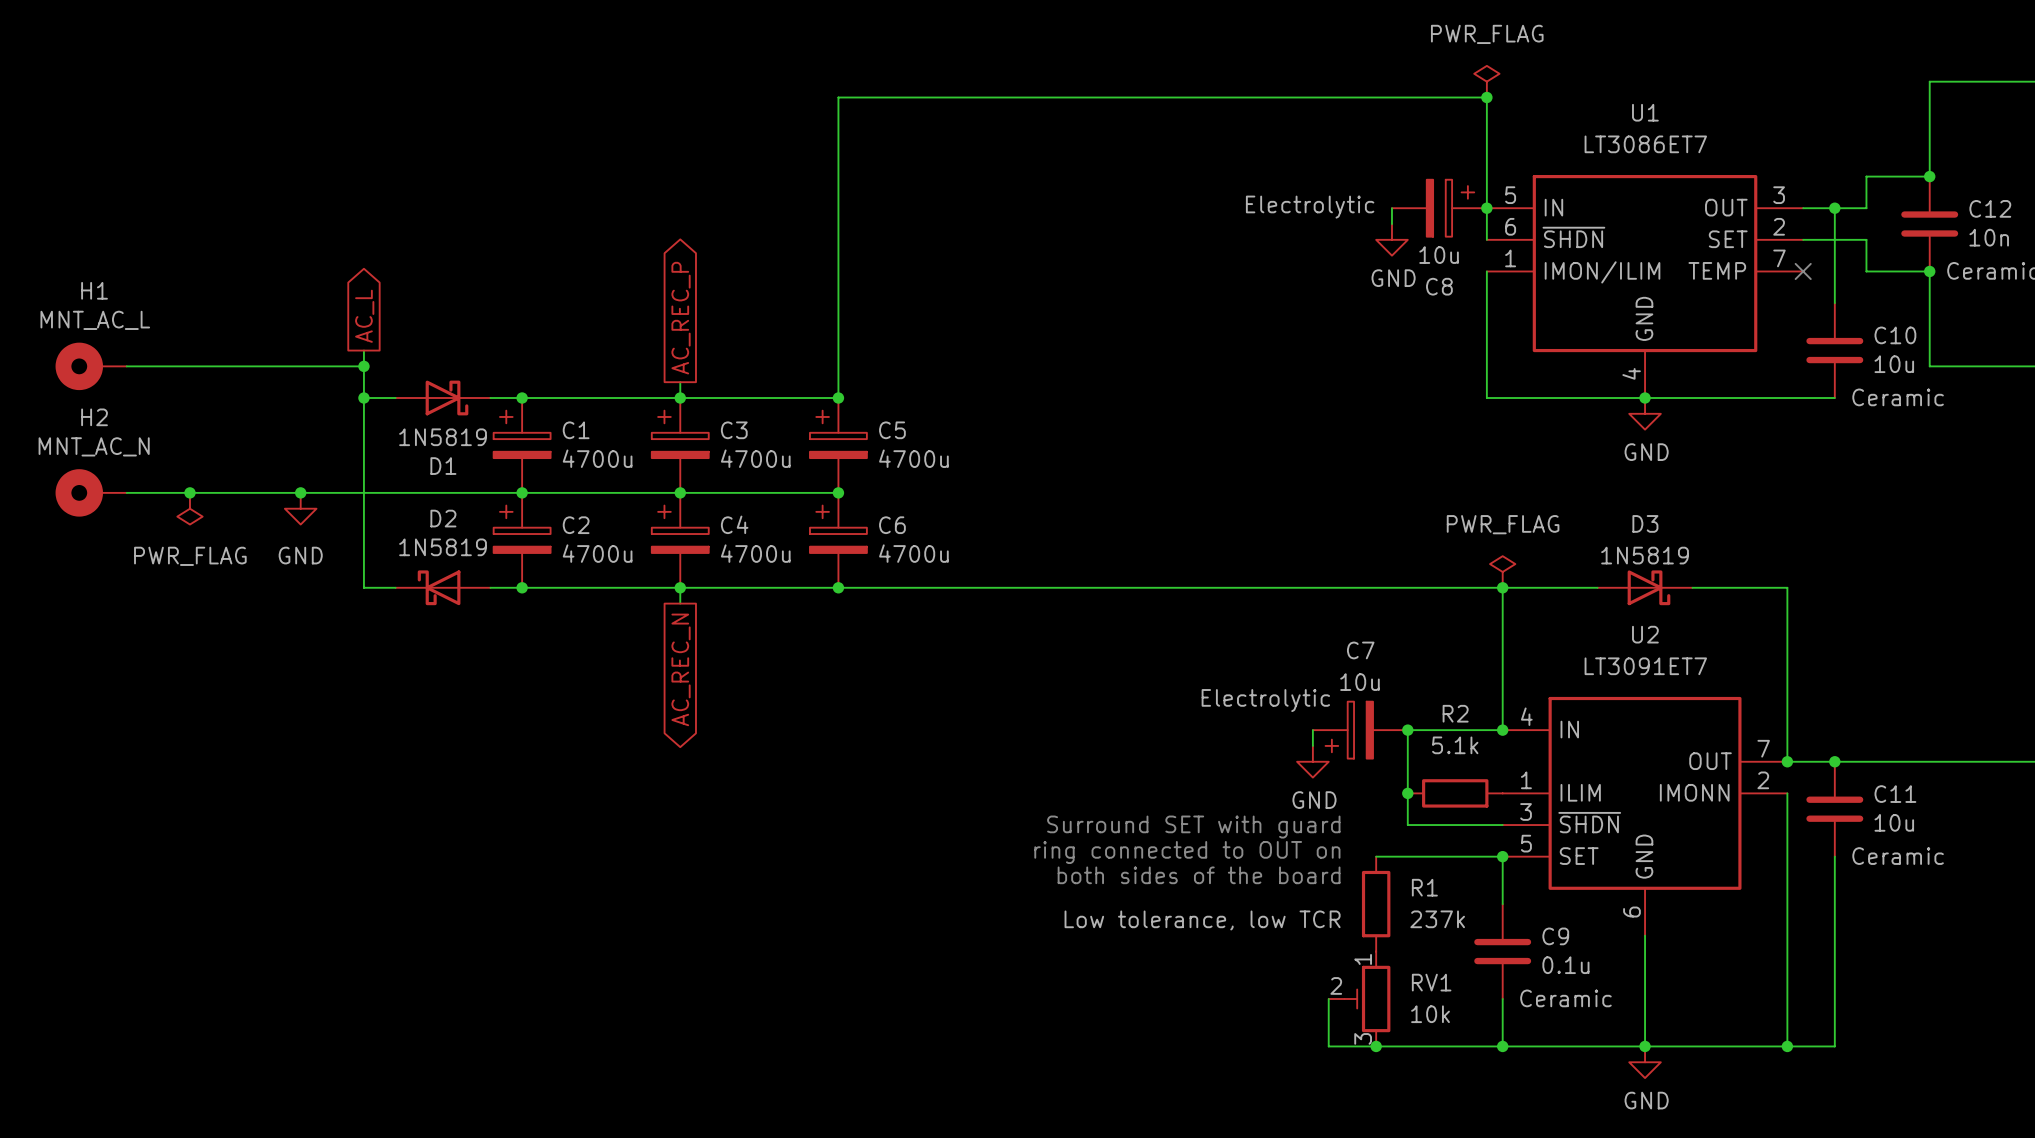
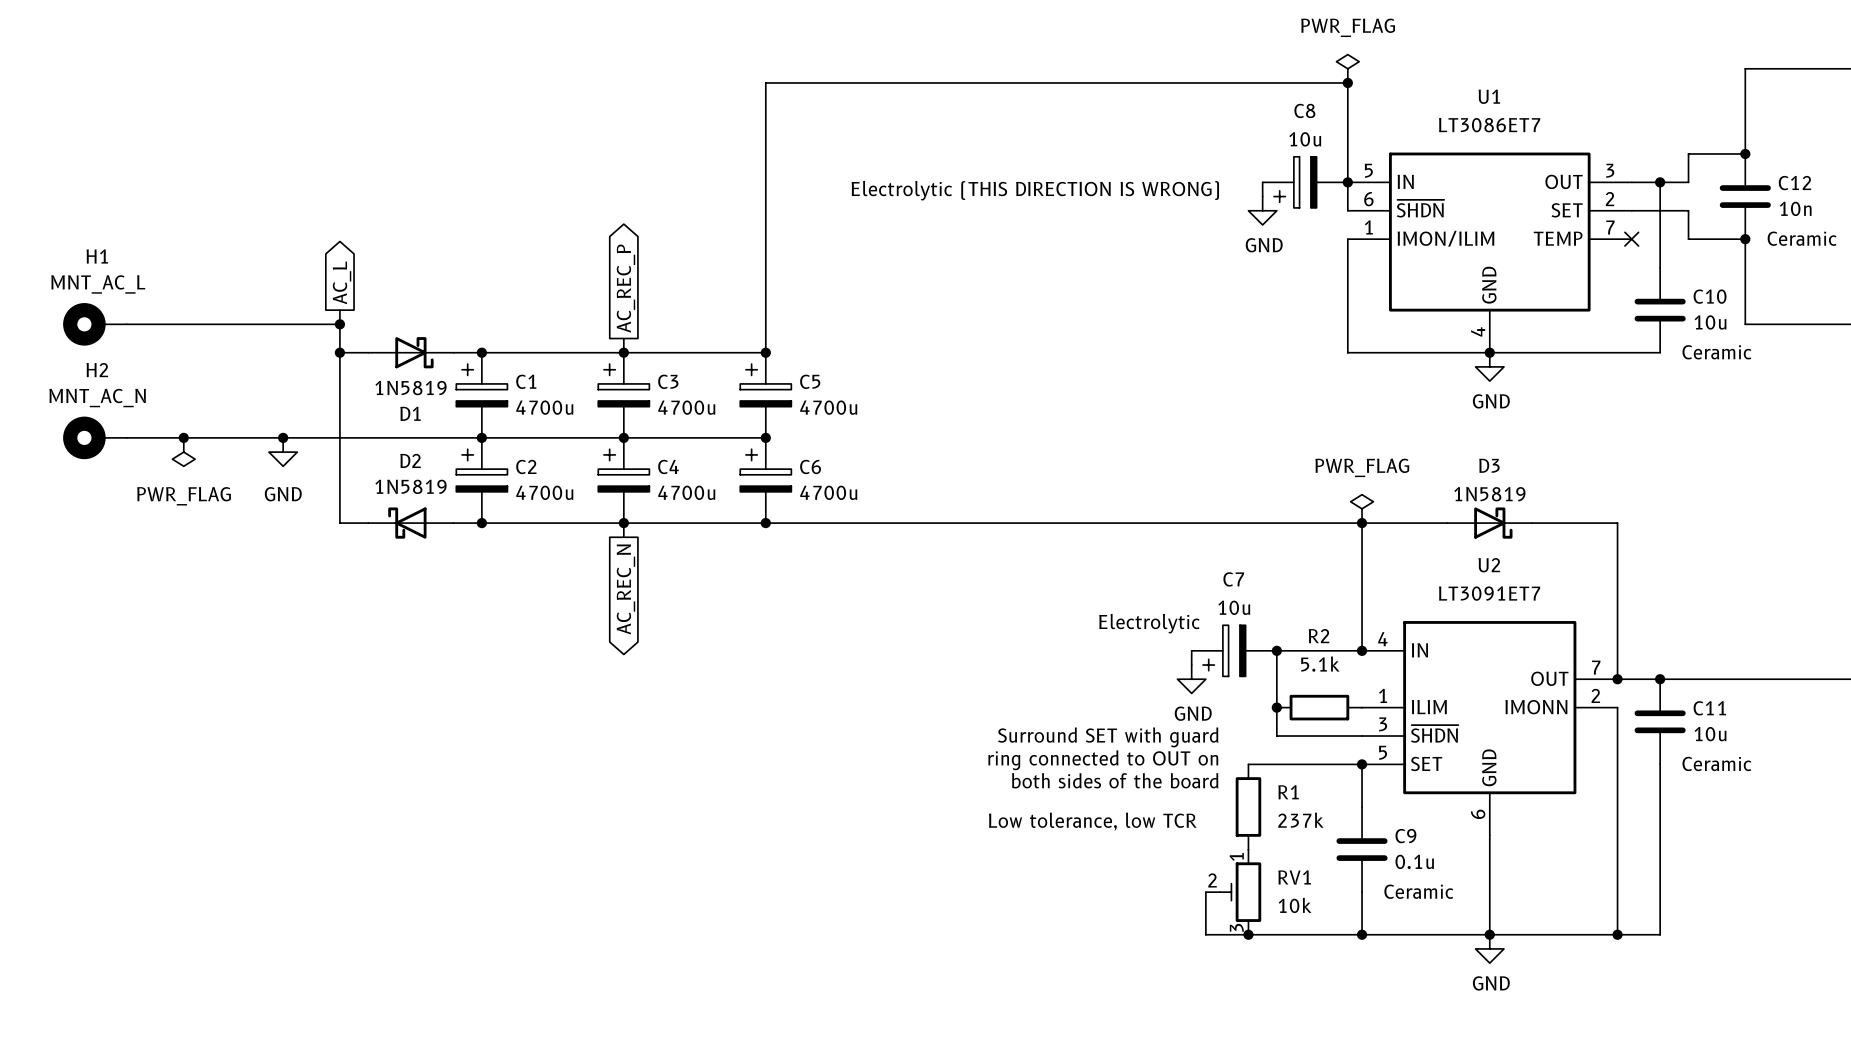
C8 text: Electrolytic (1310, 207) -> Electrolytic (THIS DIRECTION IS WRONG) (1035, 190)
C8 rotation: 0° (1450, 208) -> 180° (1295, 182)

